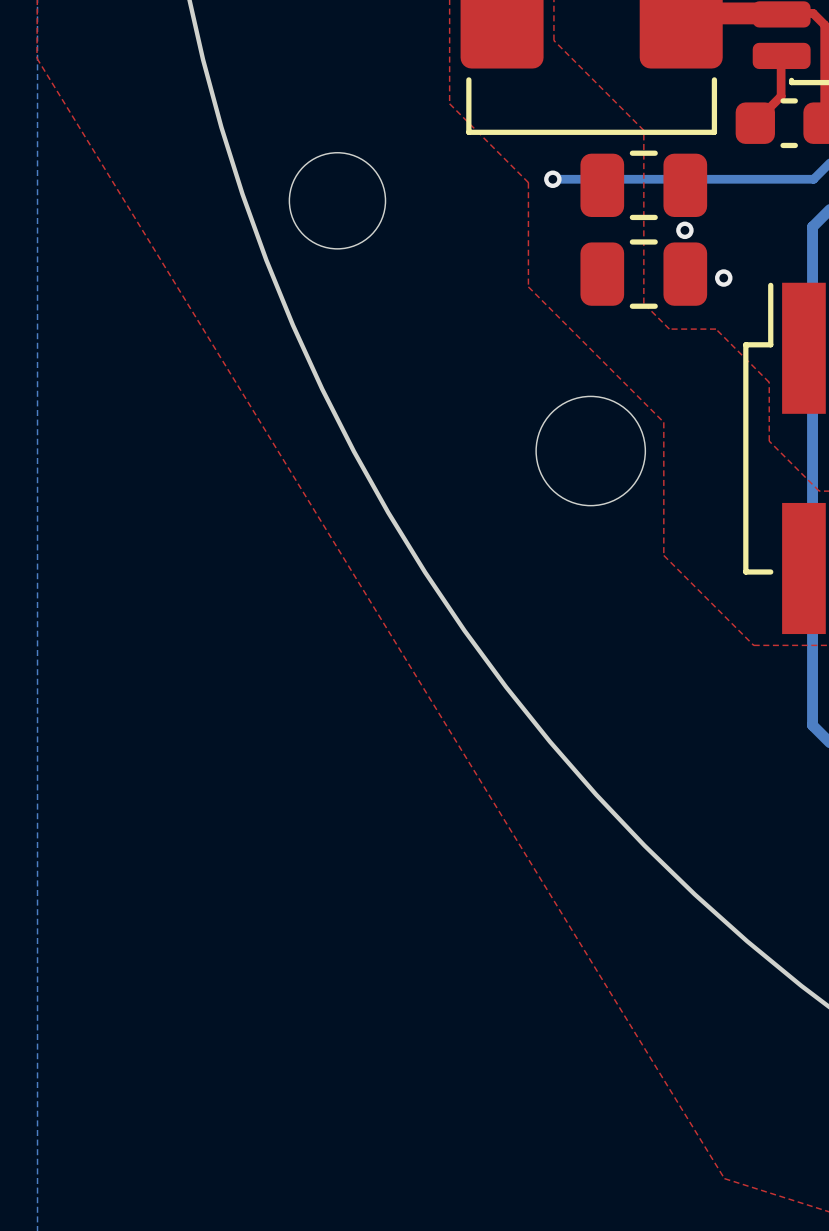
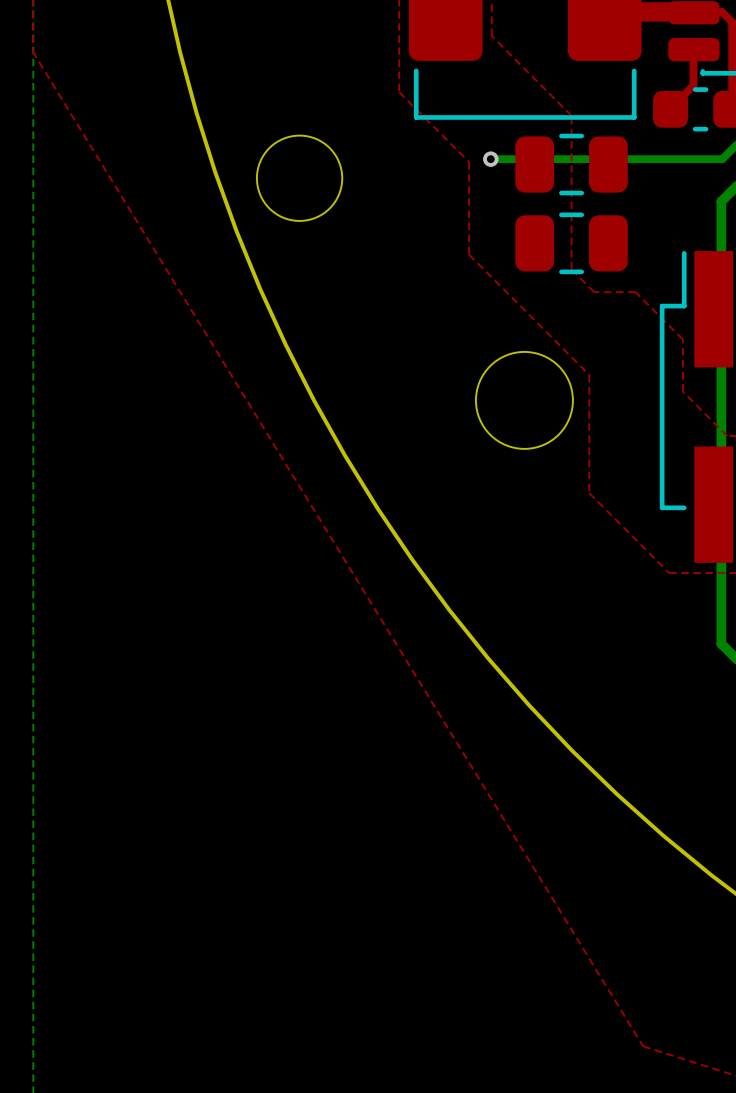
via: (684, 230) -> none
via: (723, 278) -> none

